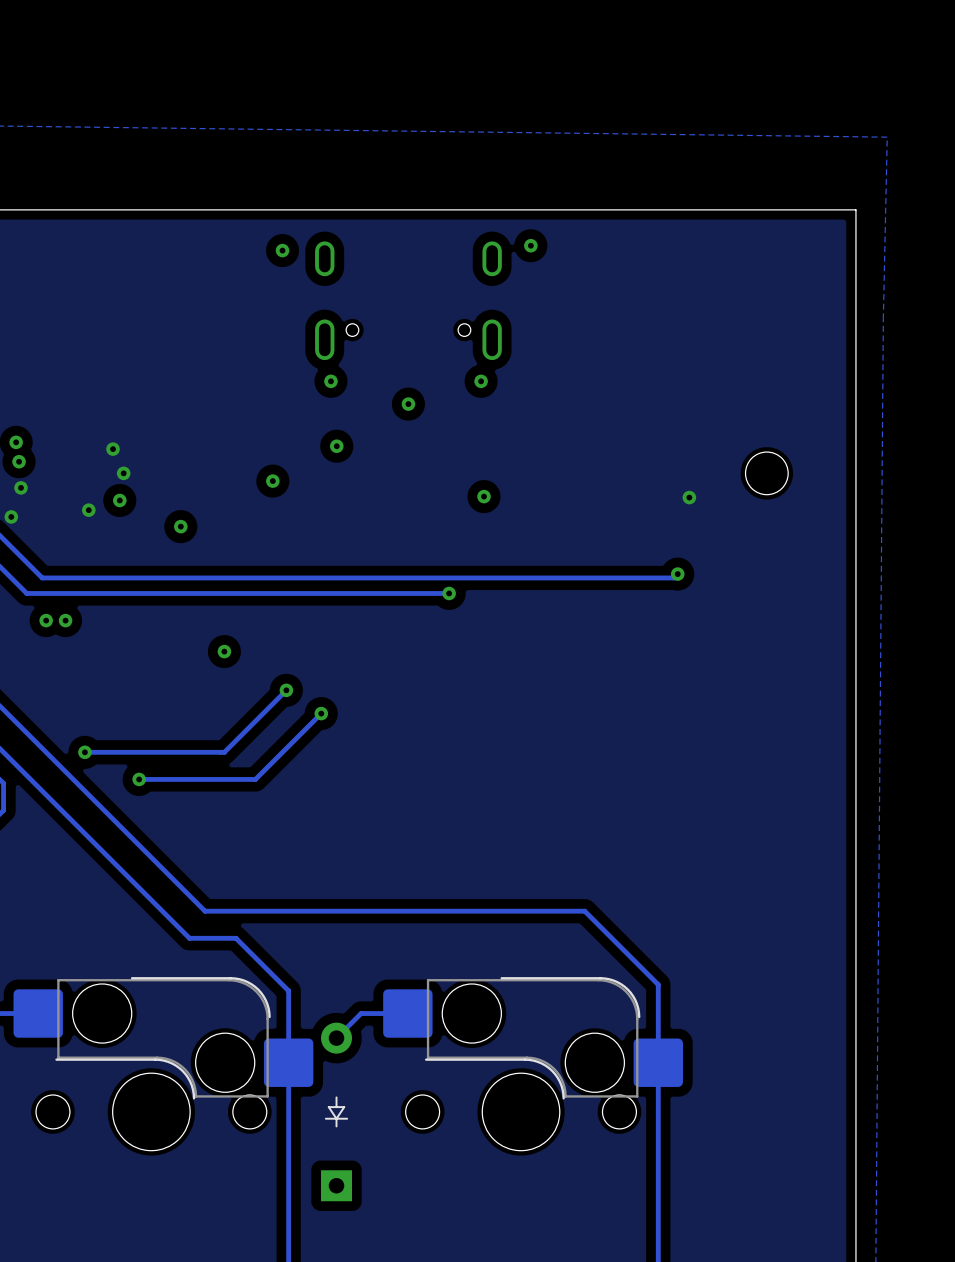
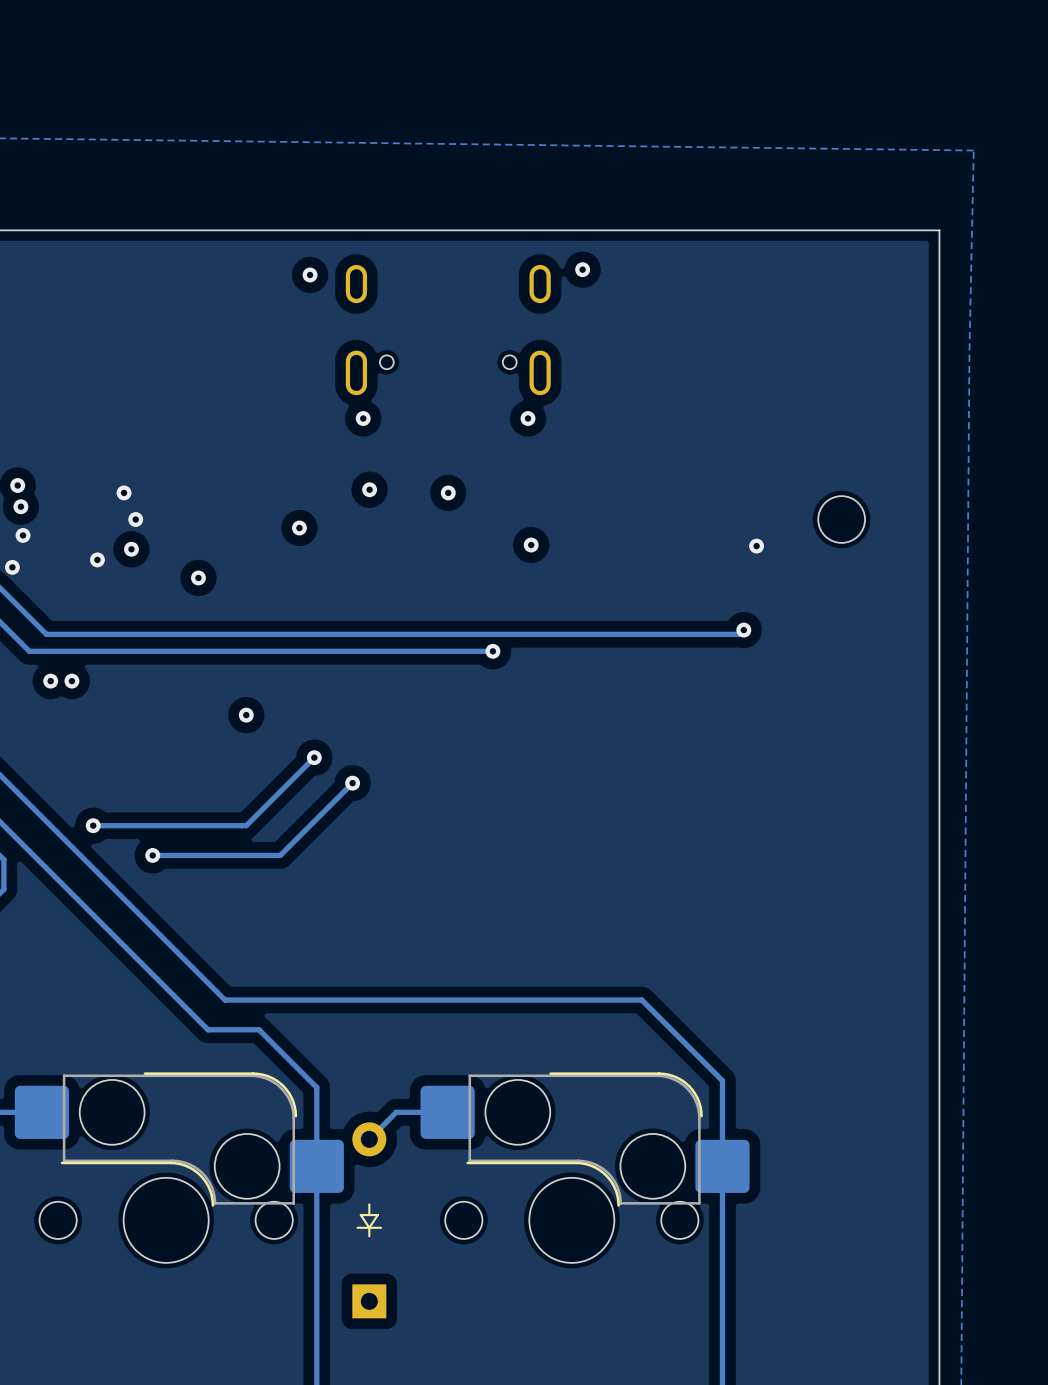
via position: (408, 404) -> (448, 492)

